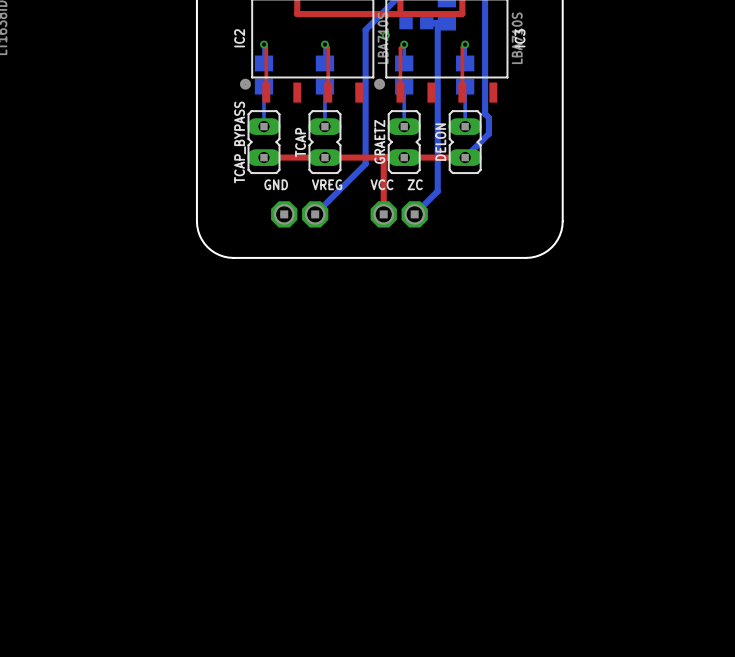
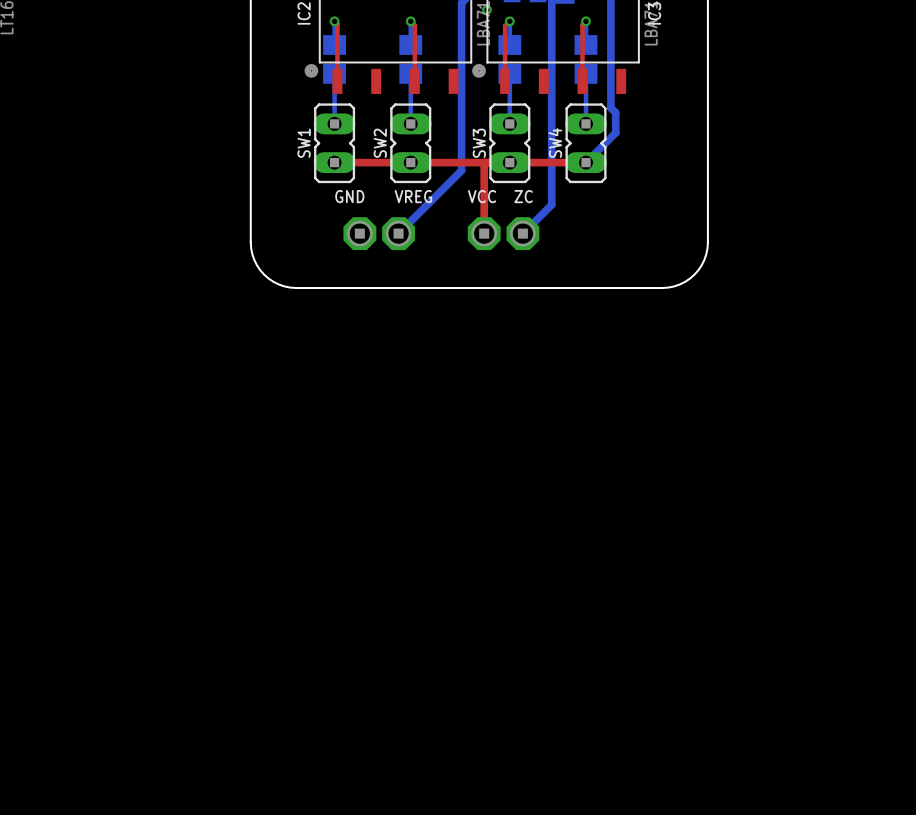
GRAETZ name: GRAETZ (379, 141) -> SW3 (479, 143)
TCAP_BYPASS name: TCAP_BYPASS (240, 142) -> SW1 (304, 143)
TCAP name: TCAP (300, 142) -> SW2 (380, 143)
DELON name: DELON (440, 142) -> SW4 (555, 143)

